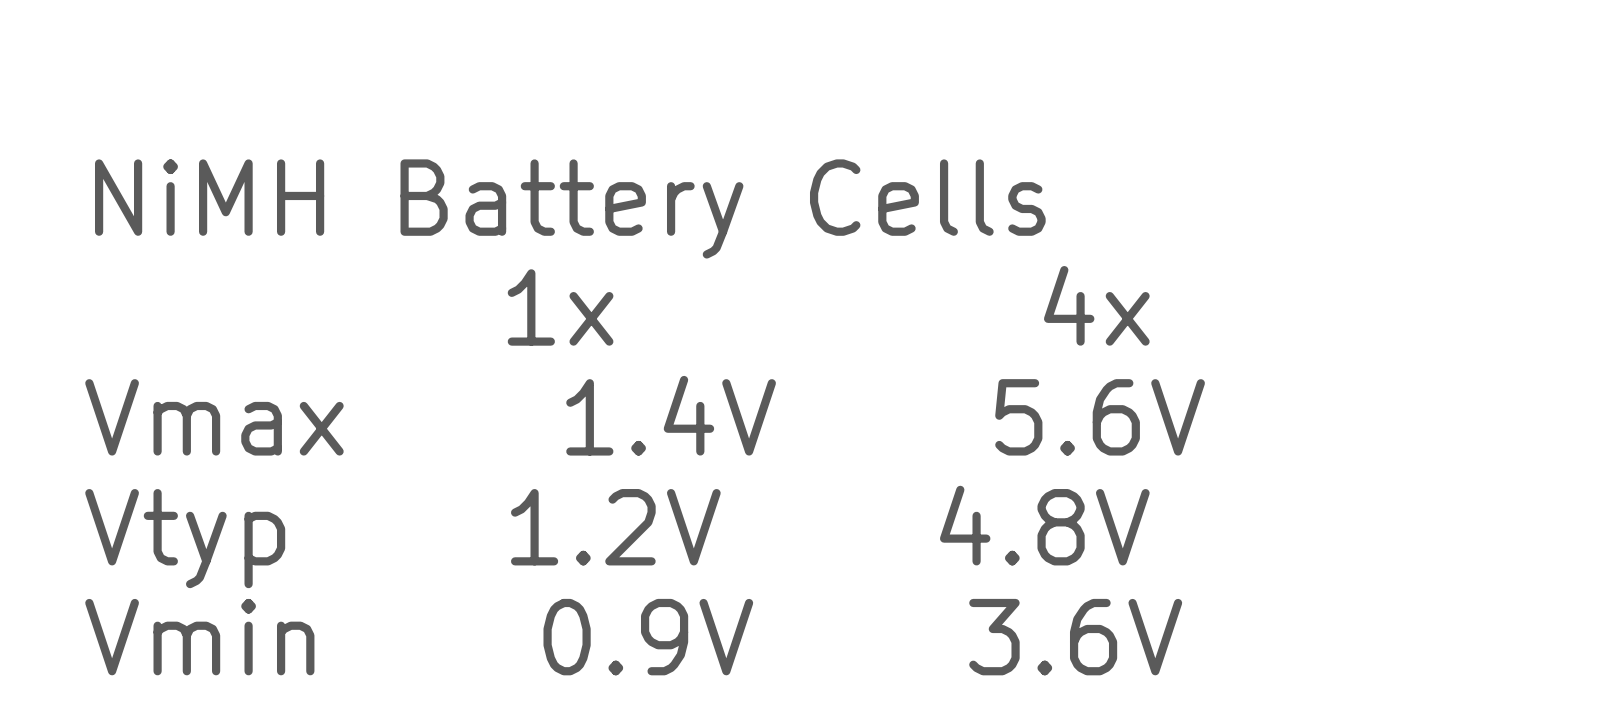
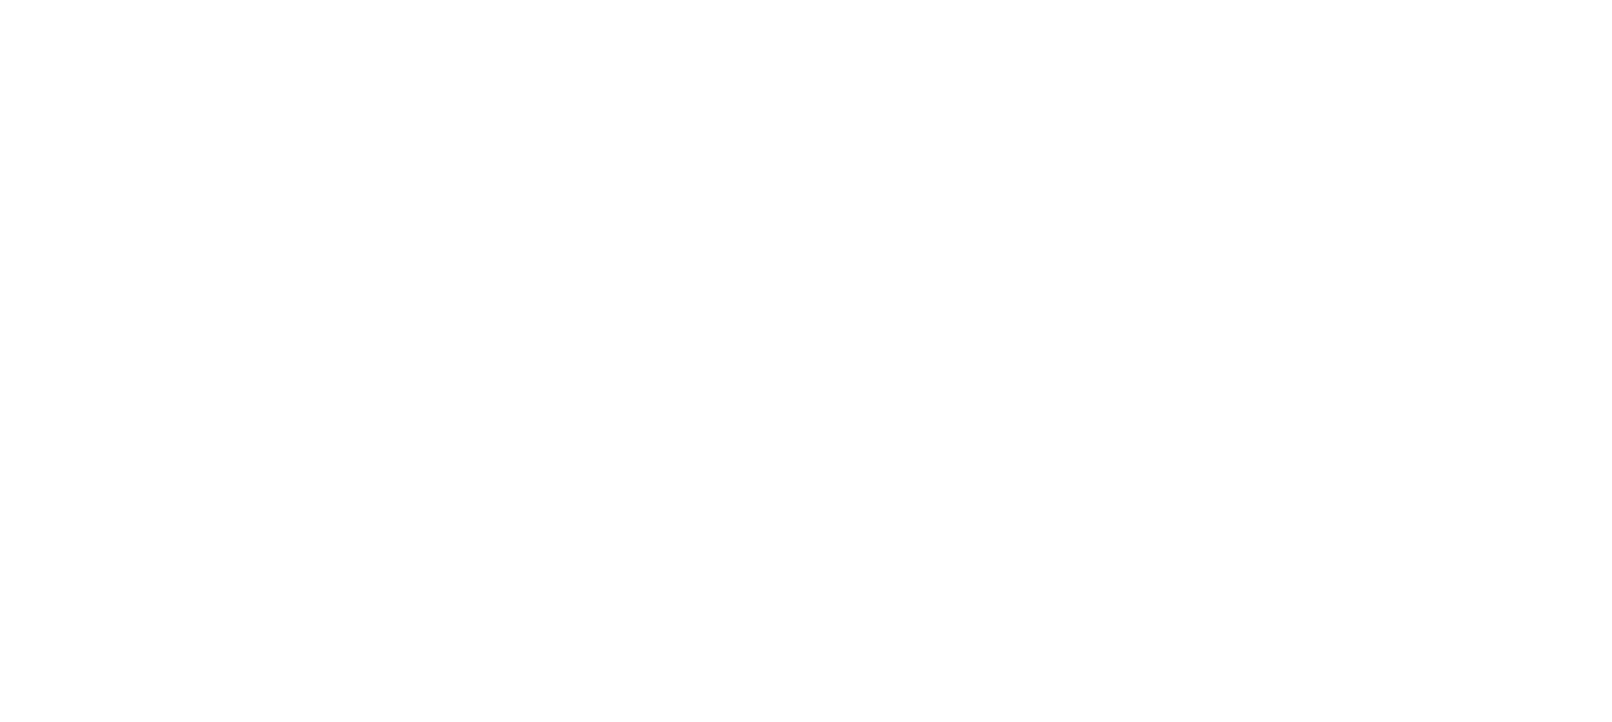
text: NiMH Battery Cells (570, 208) -> none
text: 1x 4x (828, 305) -> none
text: Vmax 1.4V 5.6V (645, 415) -> none
text: Vtyp 1.2V 4.8V (617, 536) -> none
text: Vmin 0.9V 3.6V (633, 637) -> none

